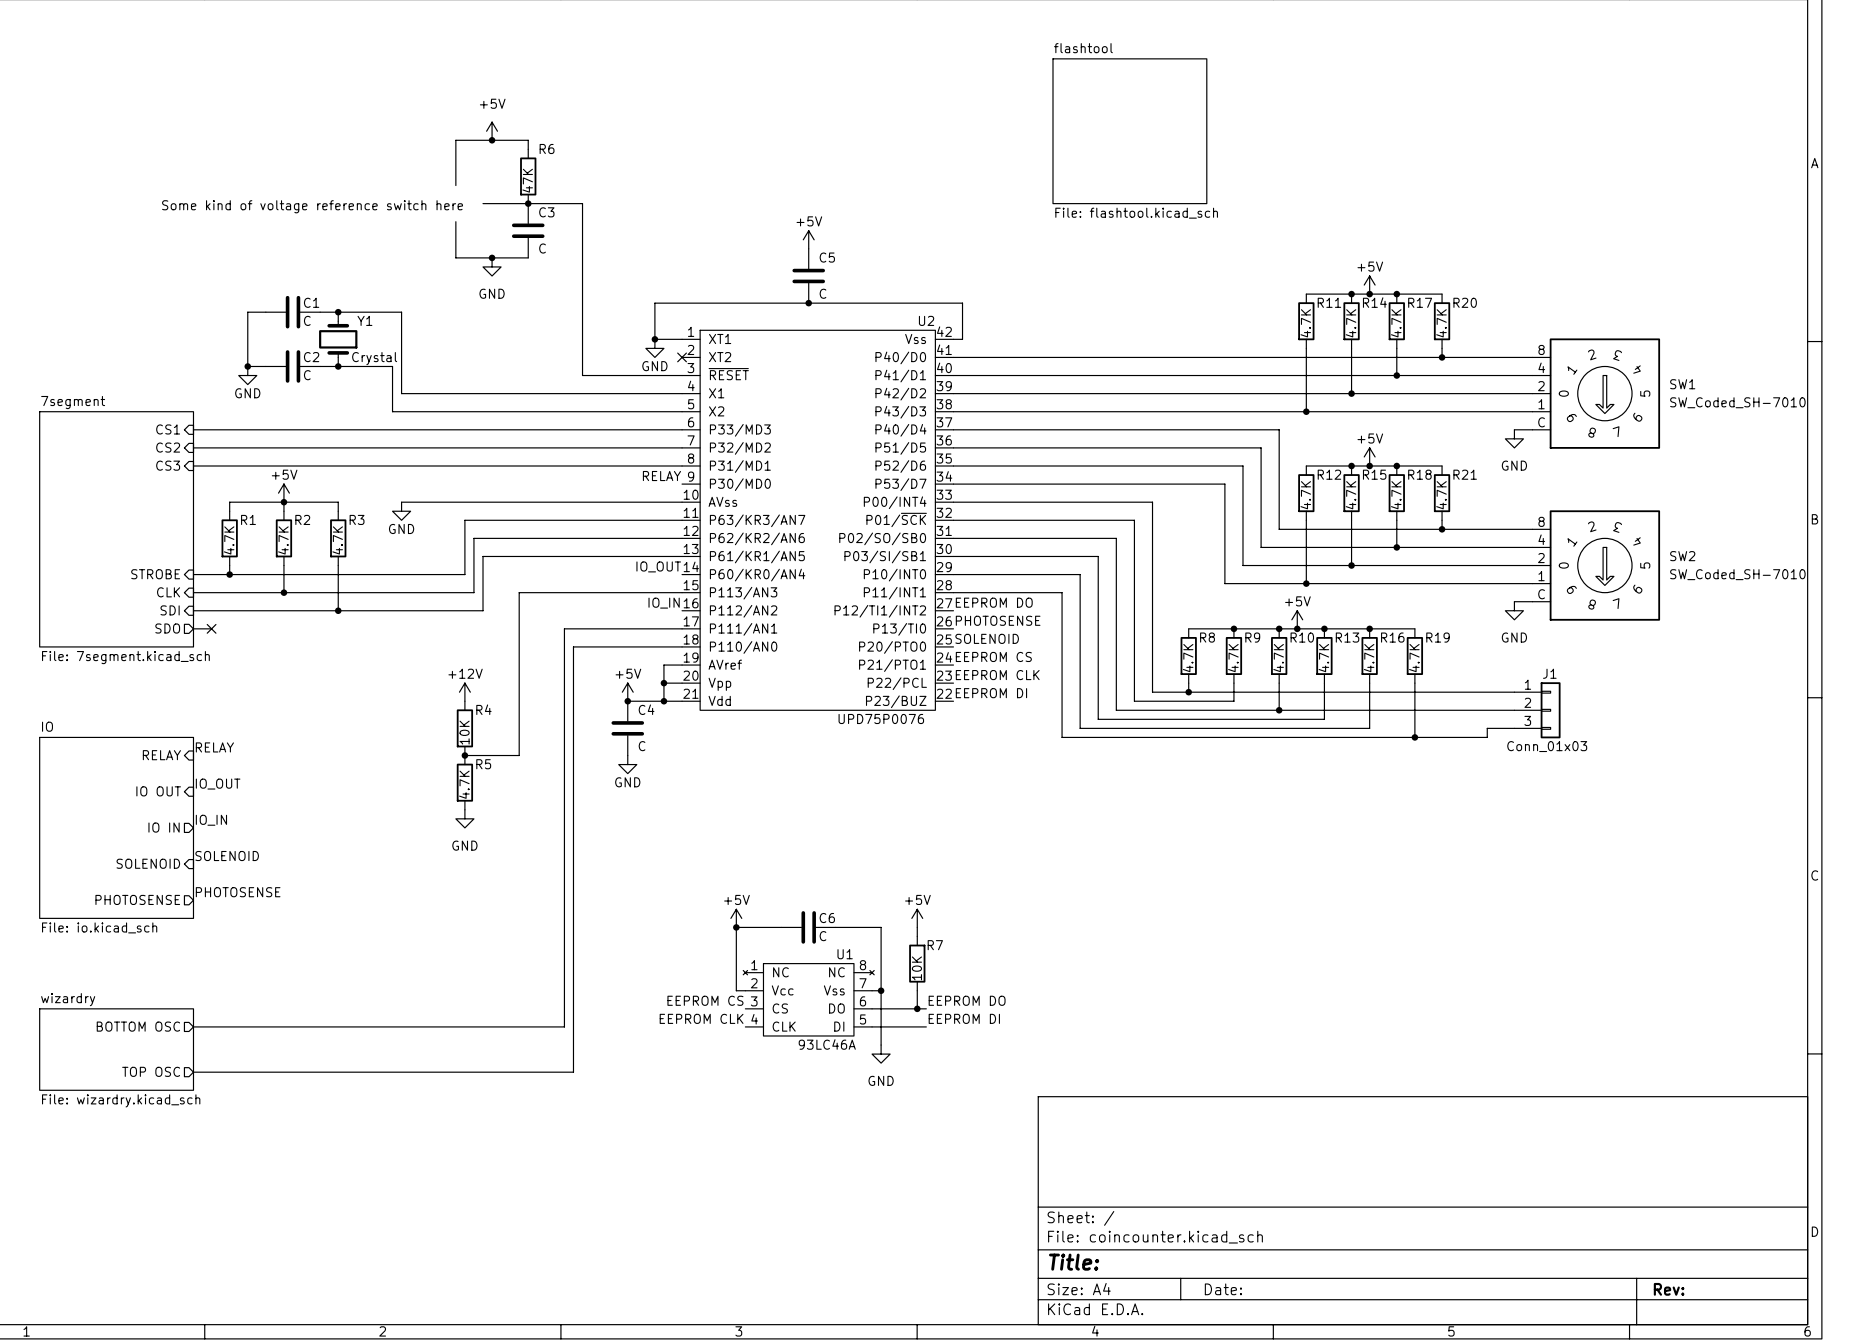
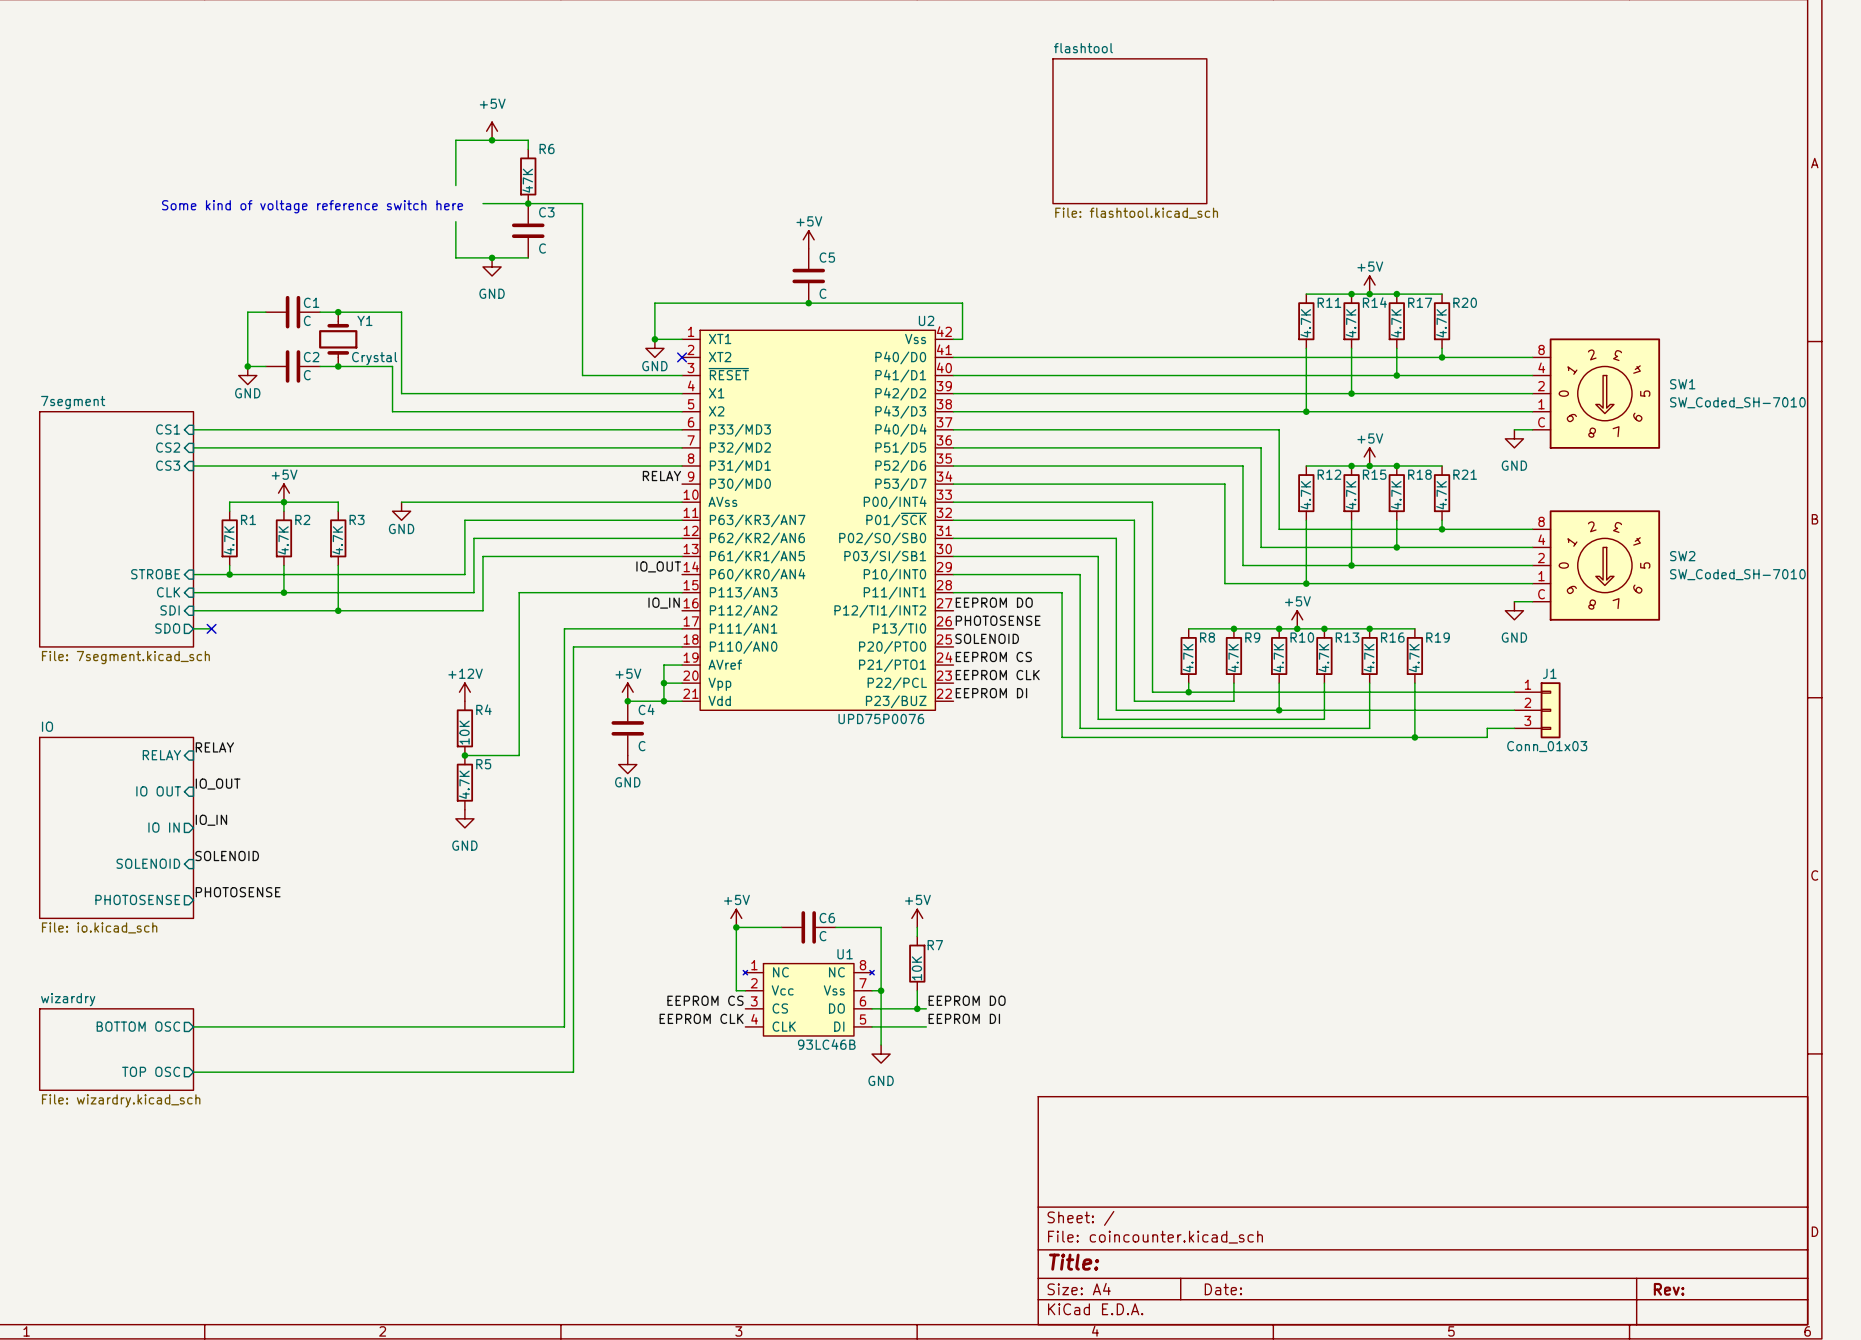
U1 value: 93LC46A (827, 1044) -> 93LC46B (826, 1044)

